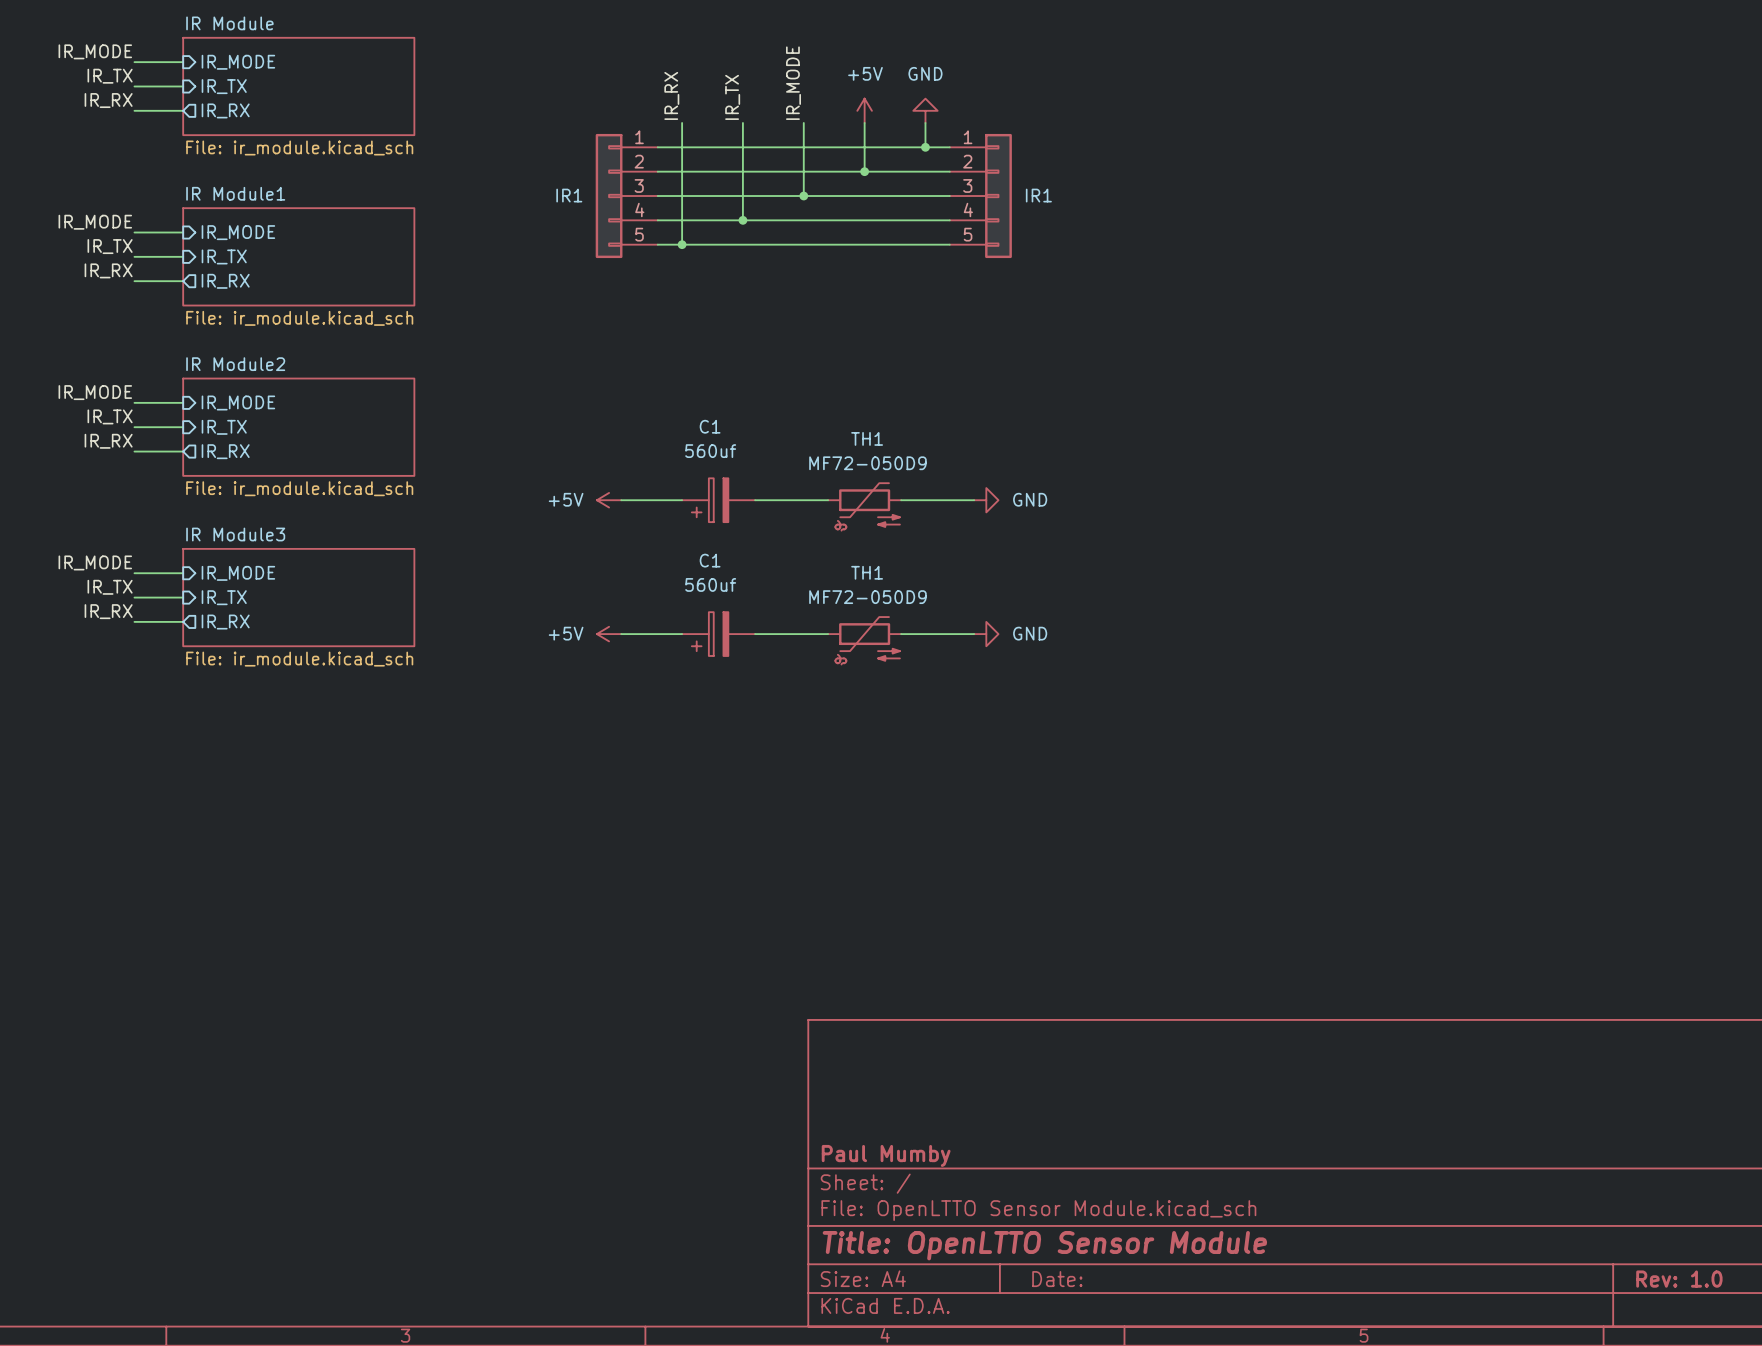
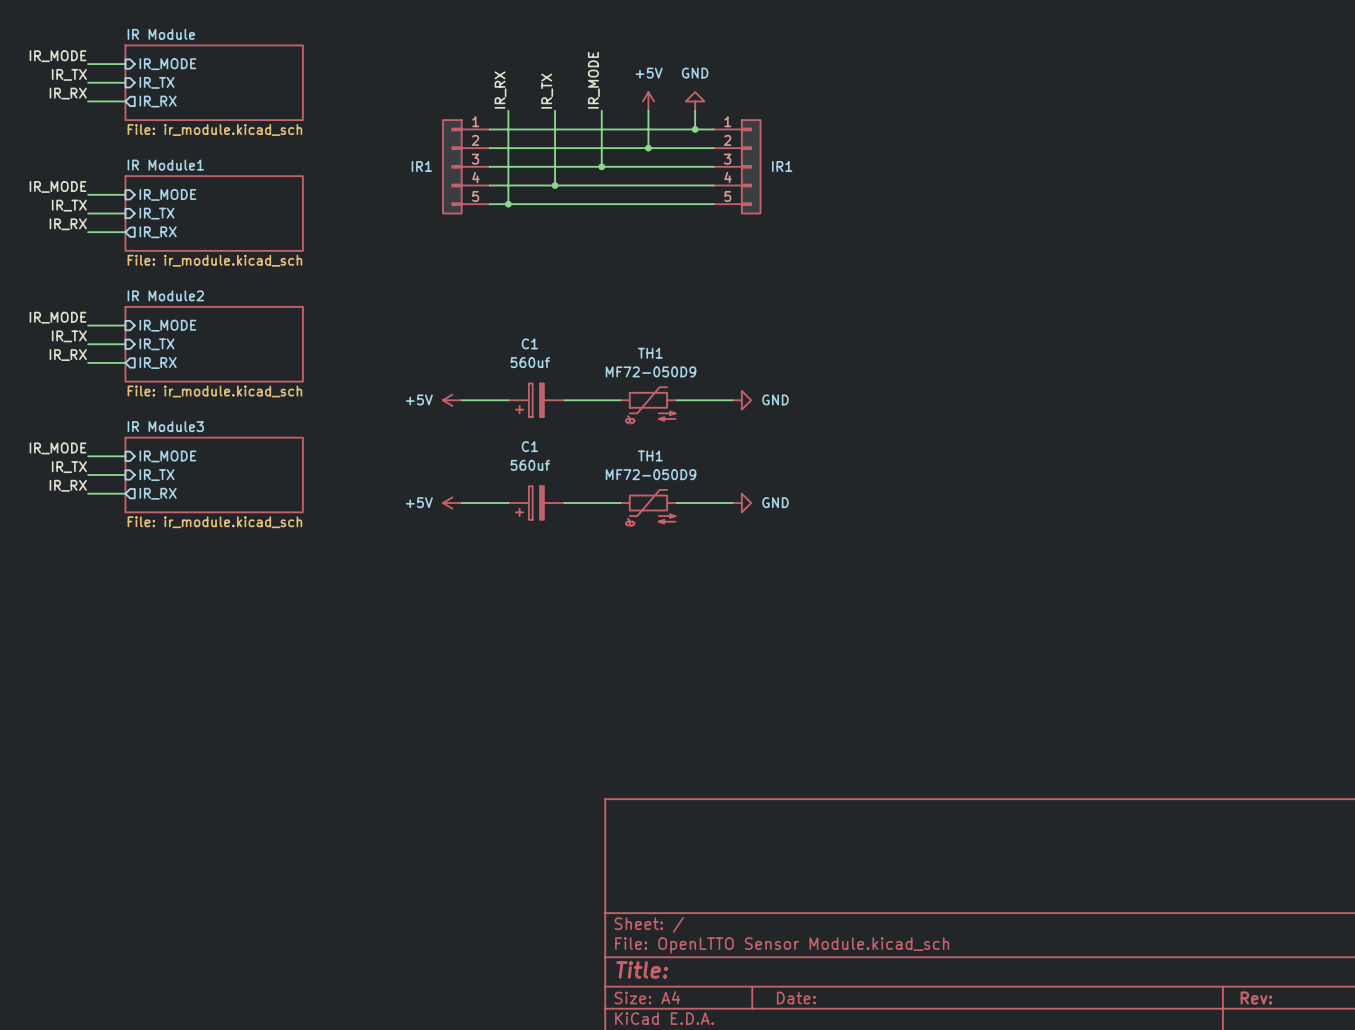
title block: Paul Mumby (886, 1155) -> none
title block: Title: OpenLTTO Sensor Module (1044, 1245) -> Title: (642, 969)
title block: Rev: 1.0 (1679, 1279) -> Rev: (1256, 998)

